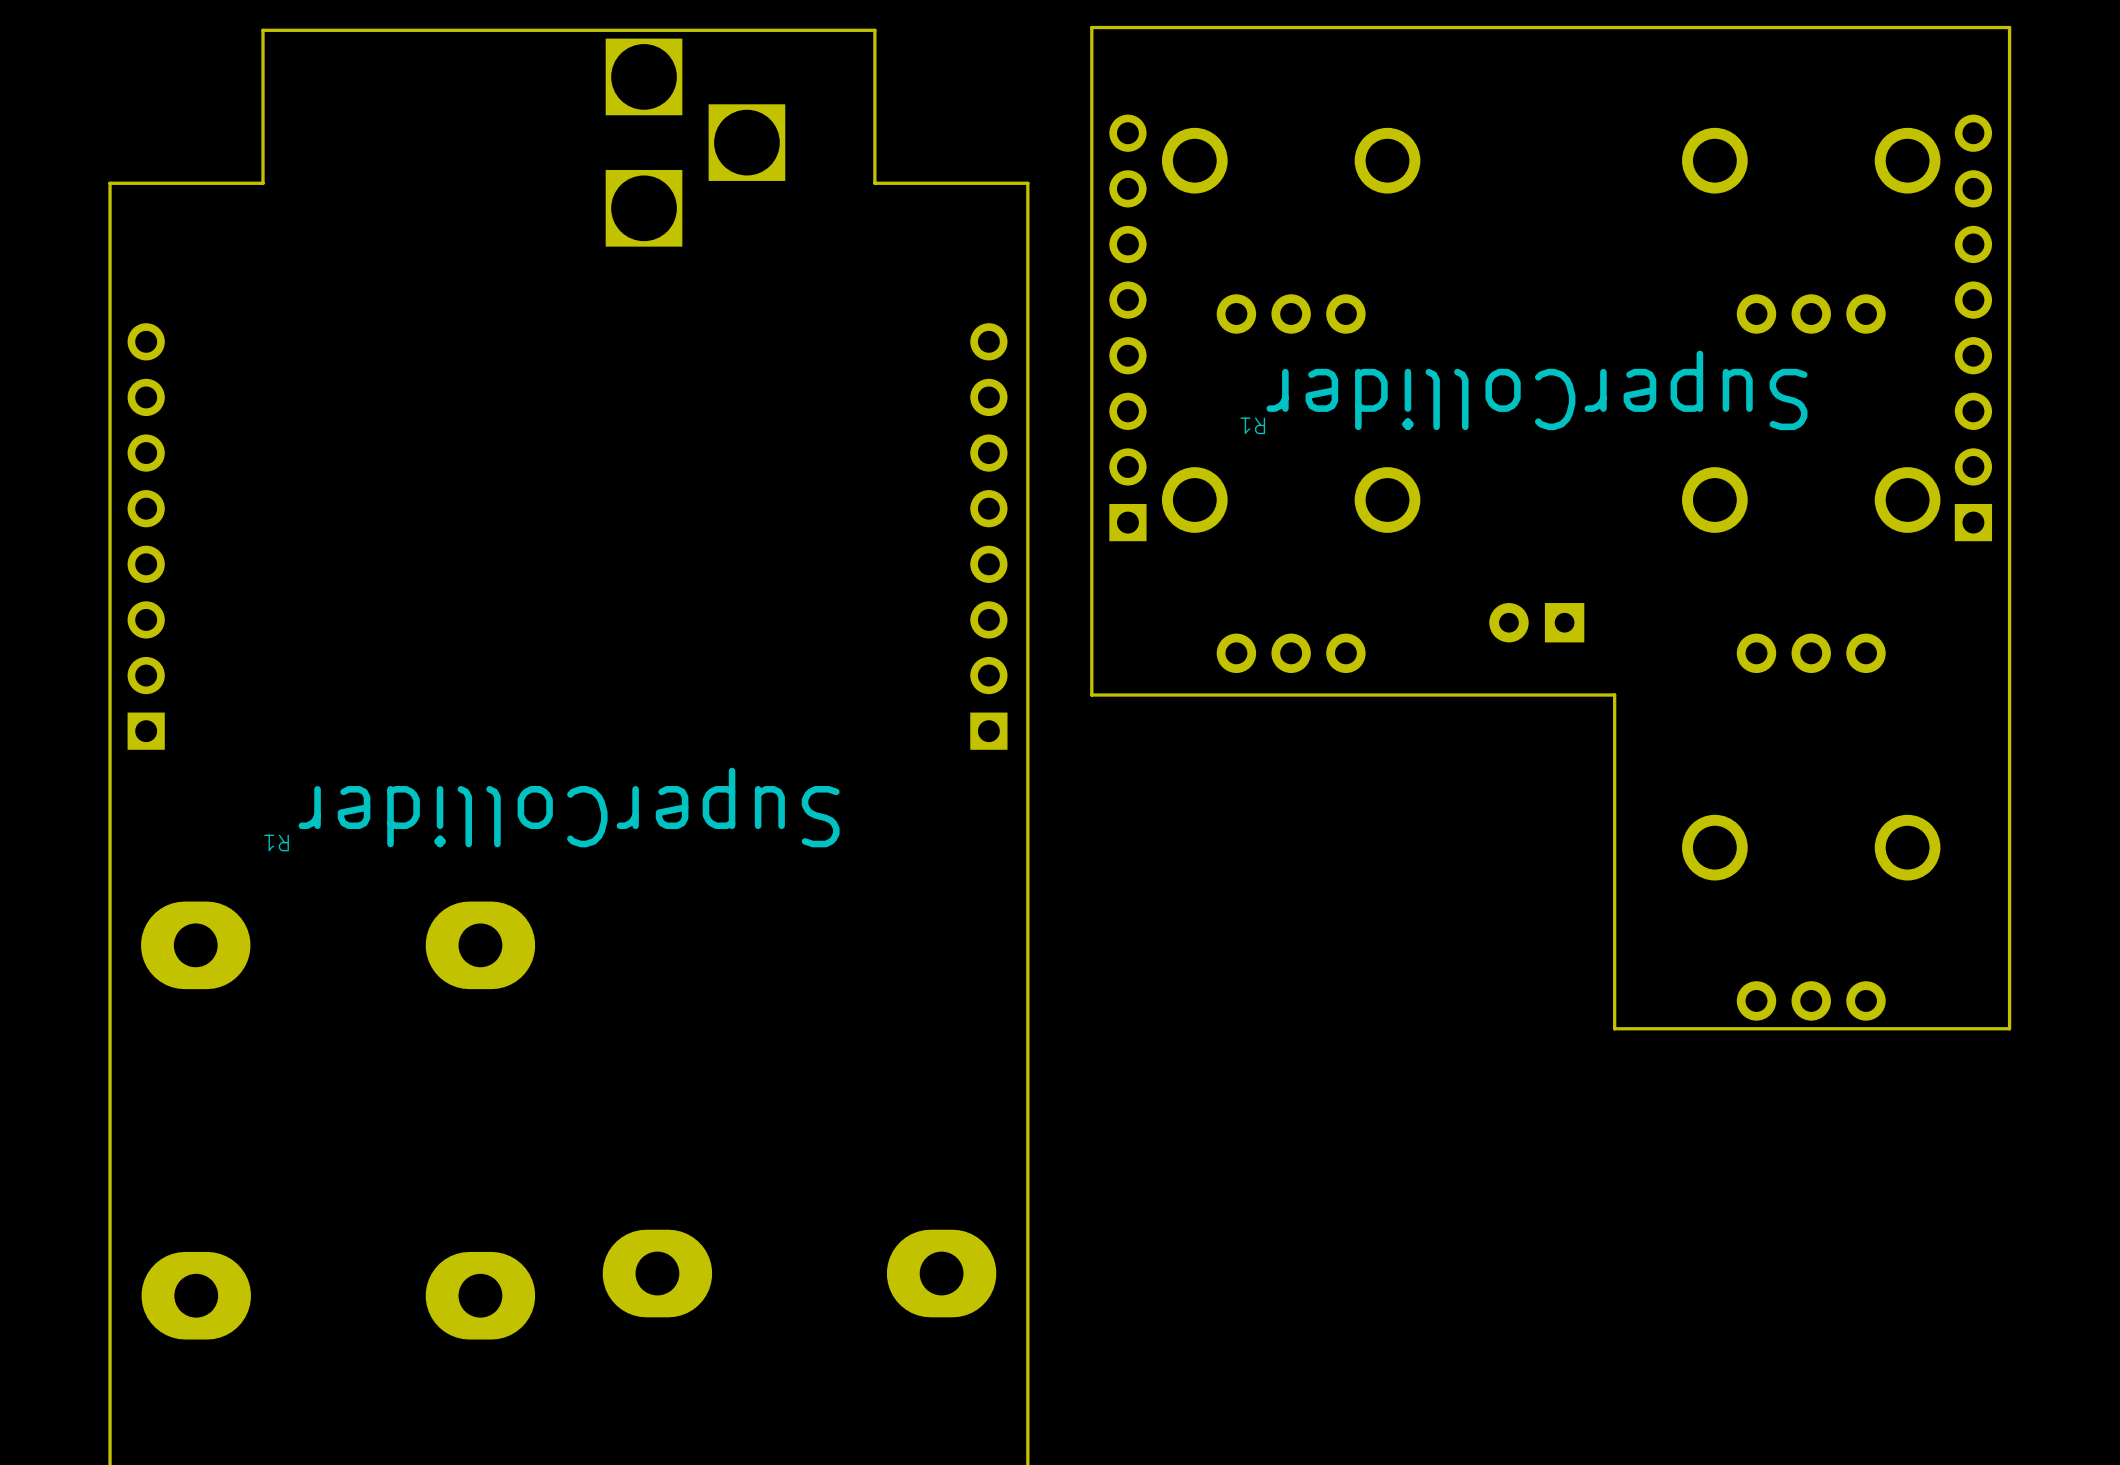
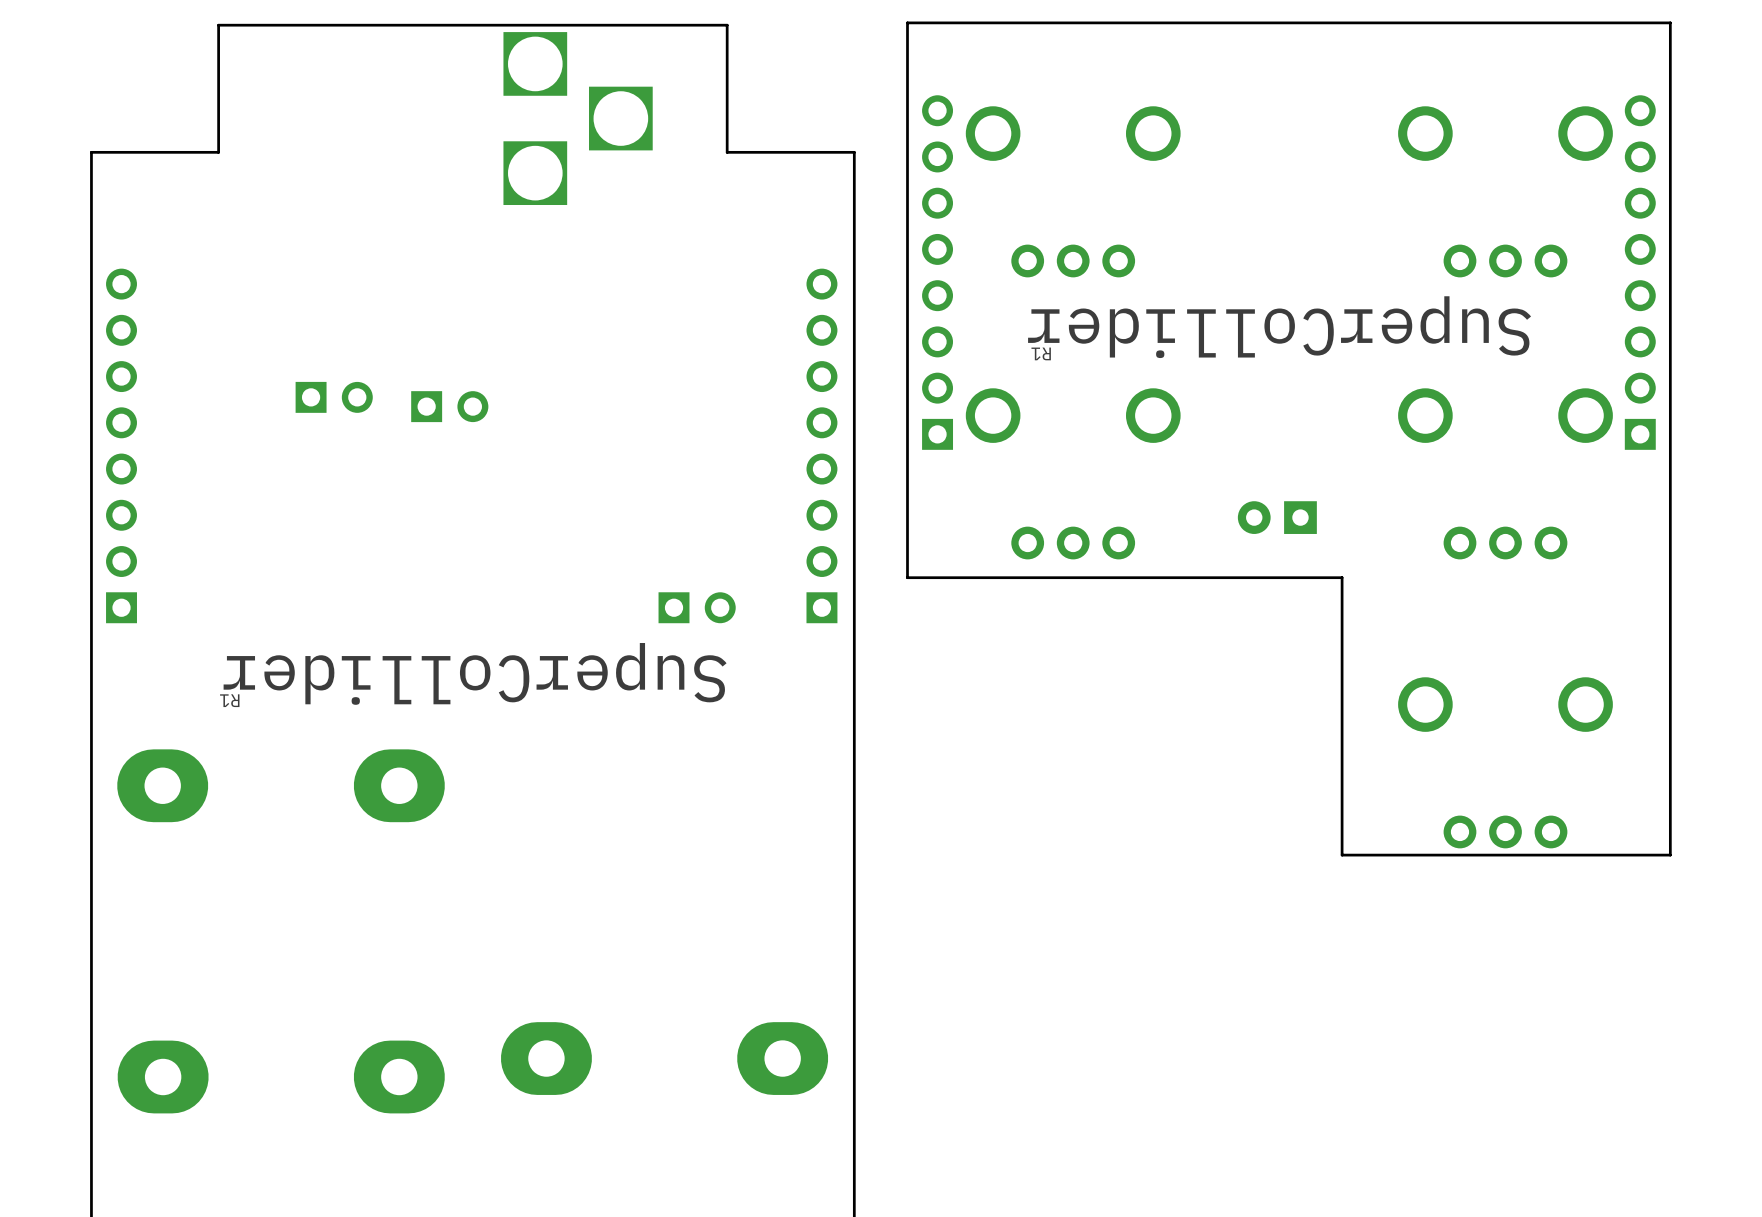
part: none -> (334, 397)
part: none -> (449, 406)
part: none -> (697, 607)

